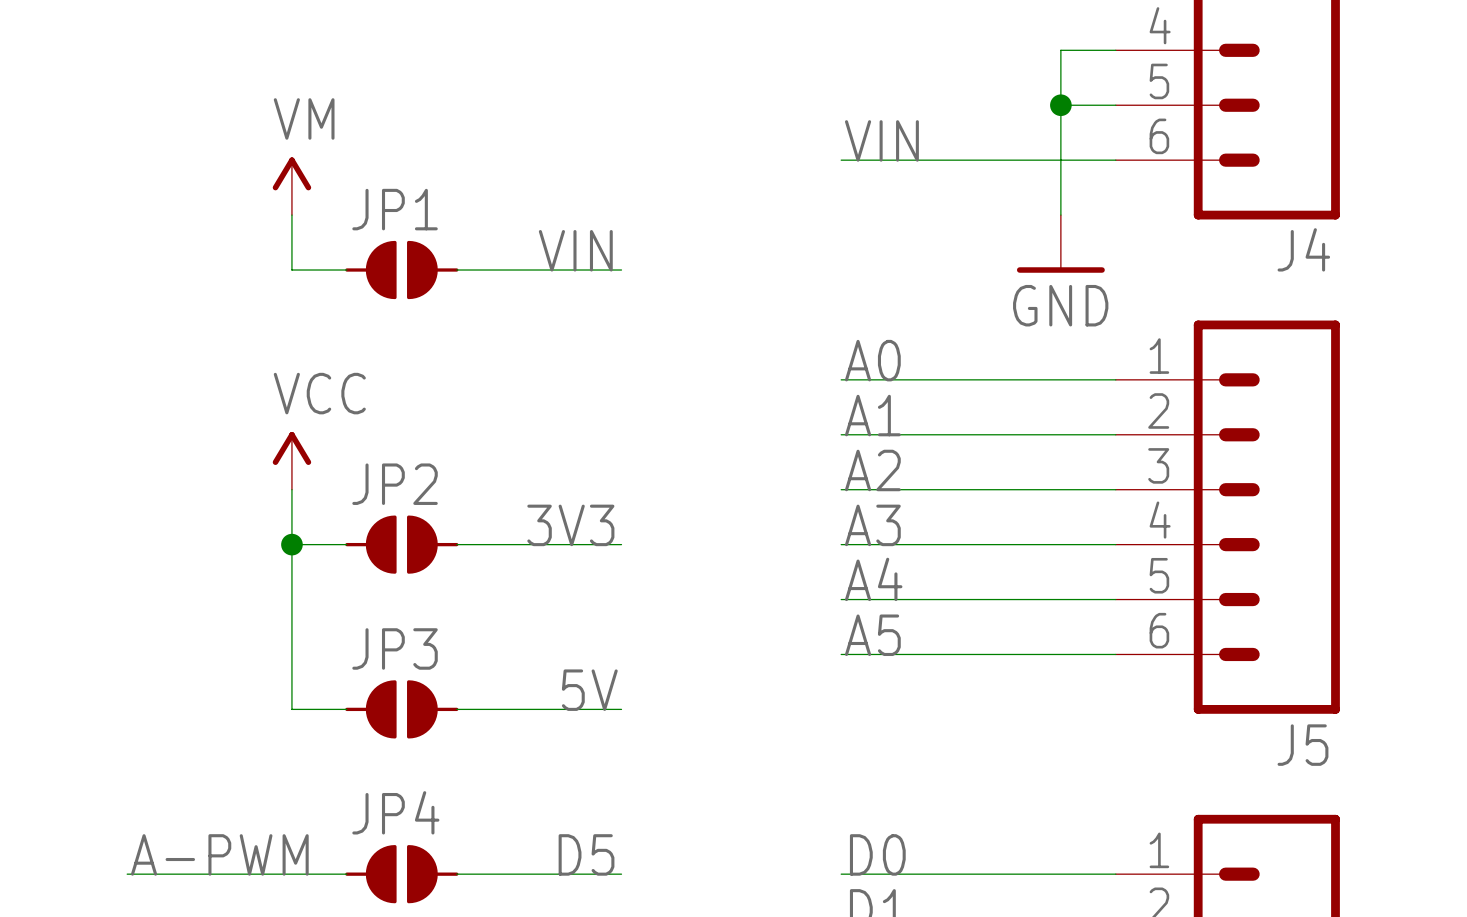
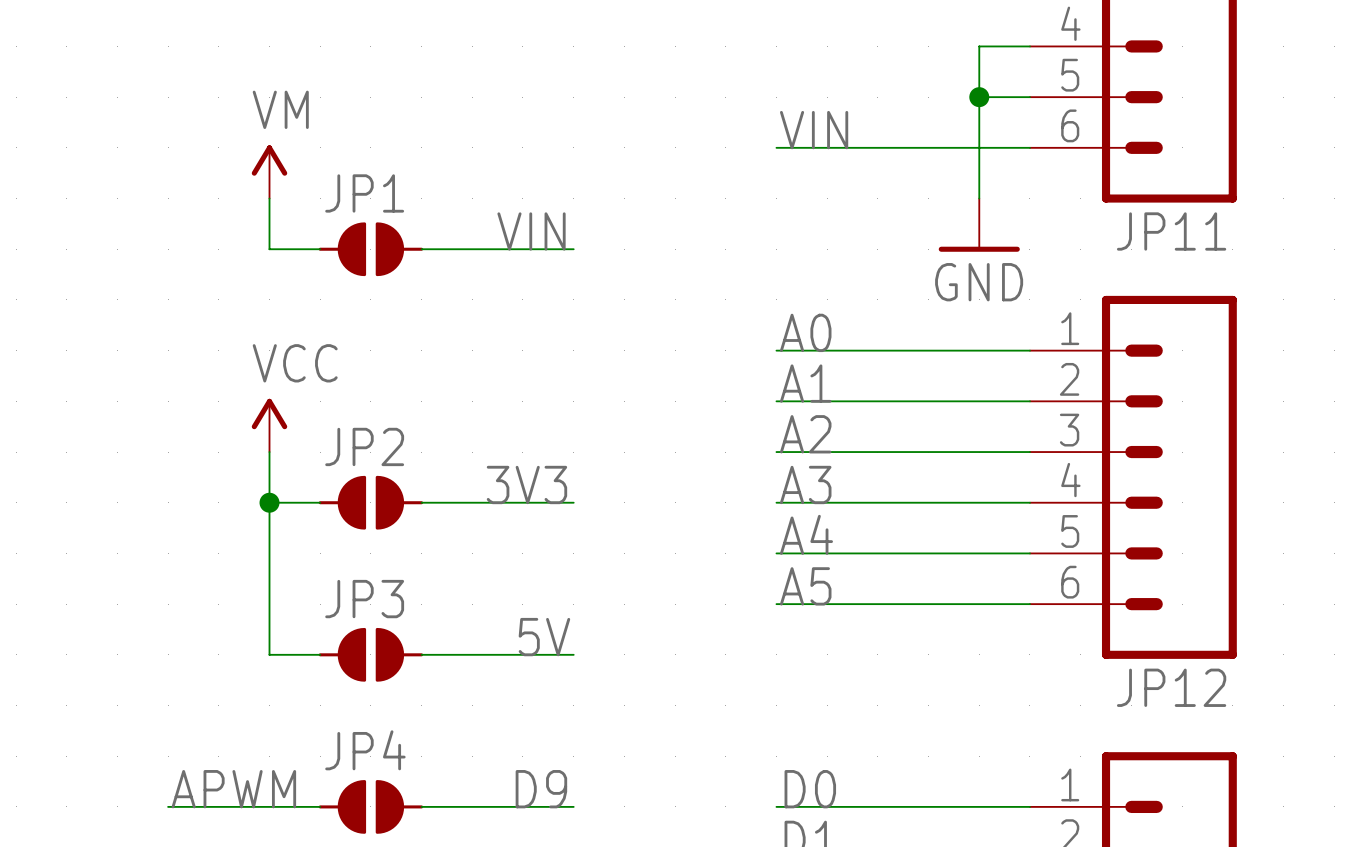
J4 name: J4 (1303, 249) -> JP11 (1171, 231)
J5 name: J5 (1302, 745) -> JP12 (1171, 687)
label: A-PWM (219, 854) -> APWM (233, 789)
label: D5 (586, 854) -> D9 (541, 789)
wire: (127, 874) (182, 874) -> none

